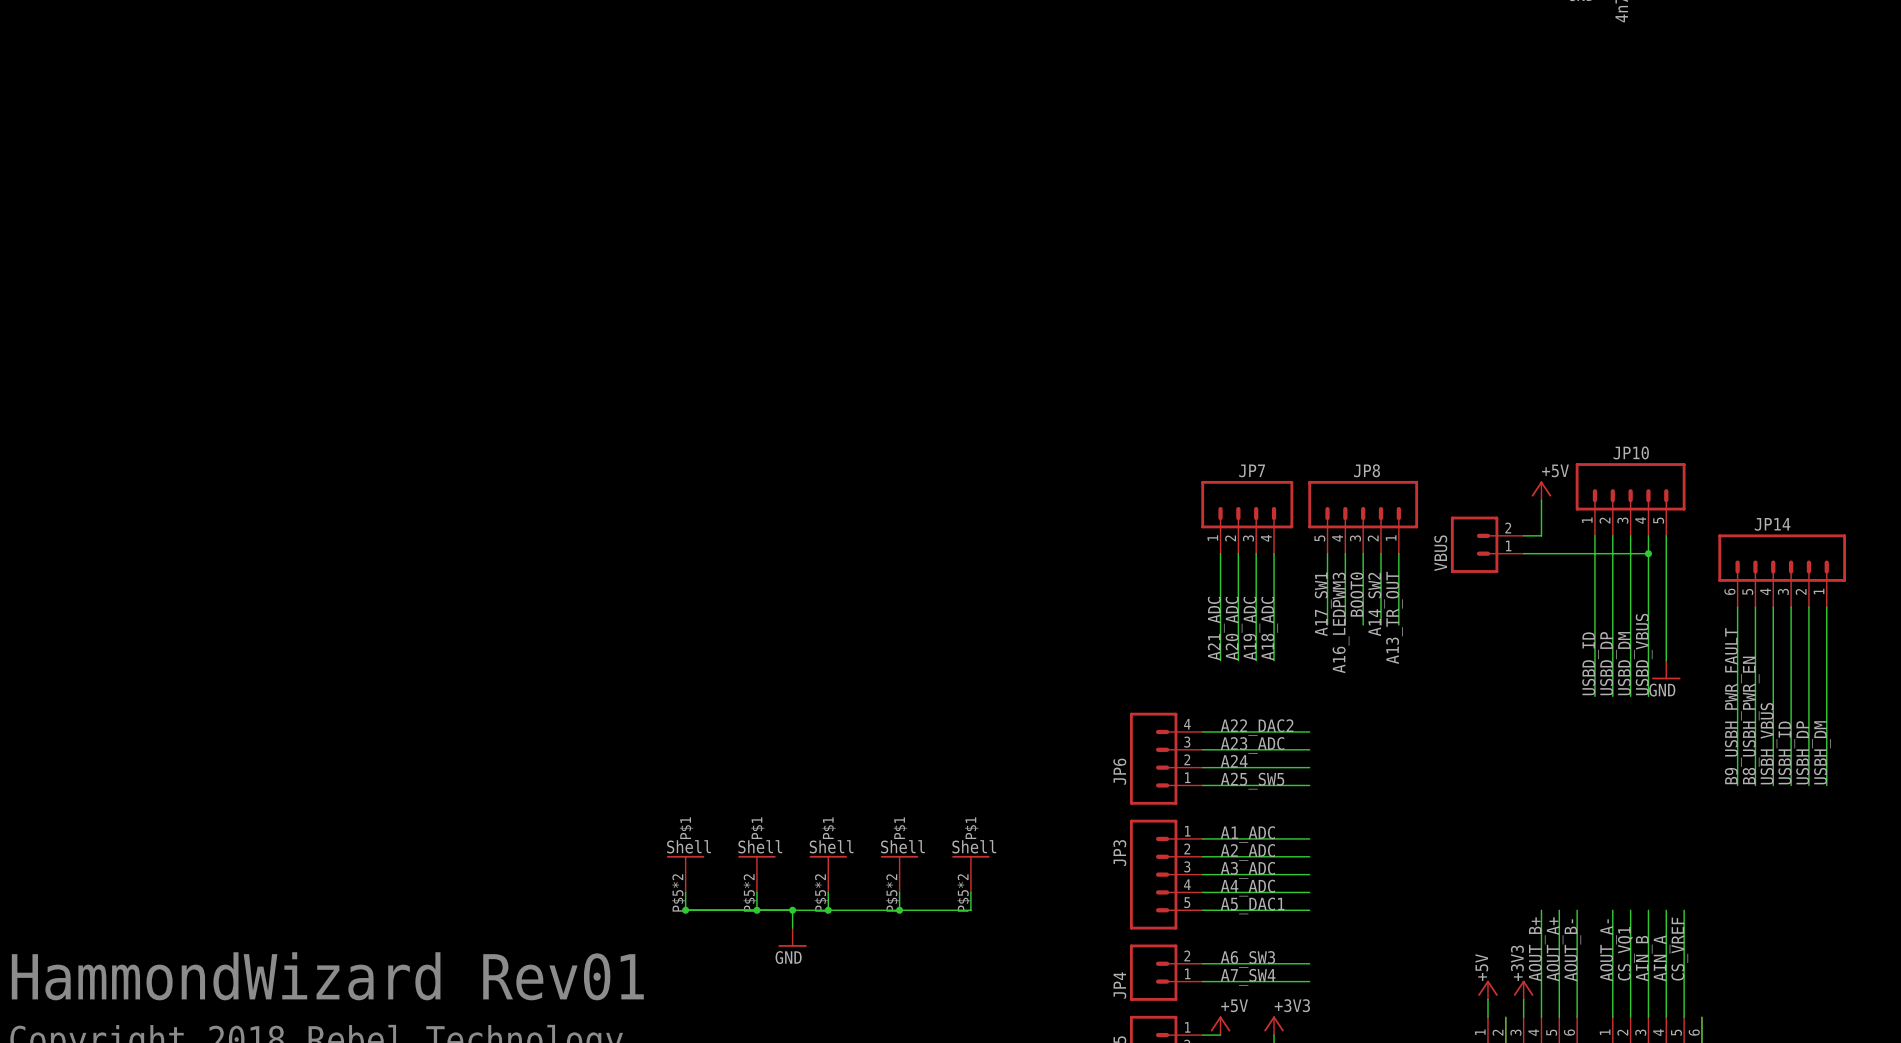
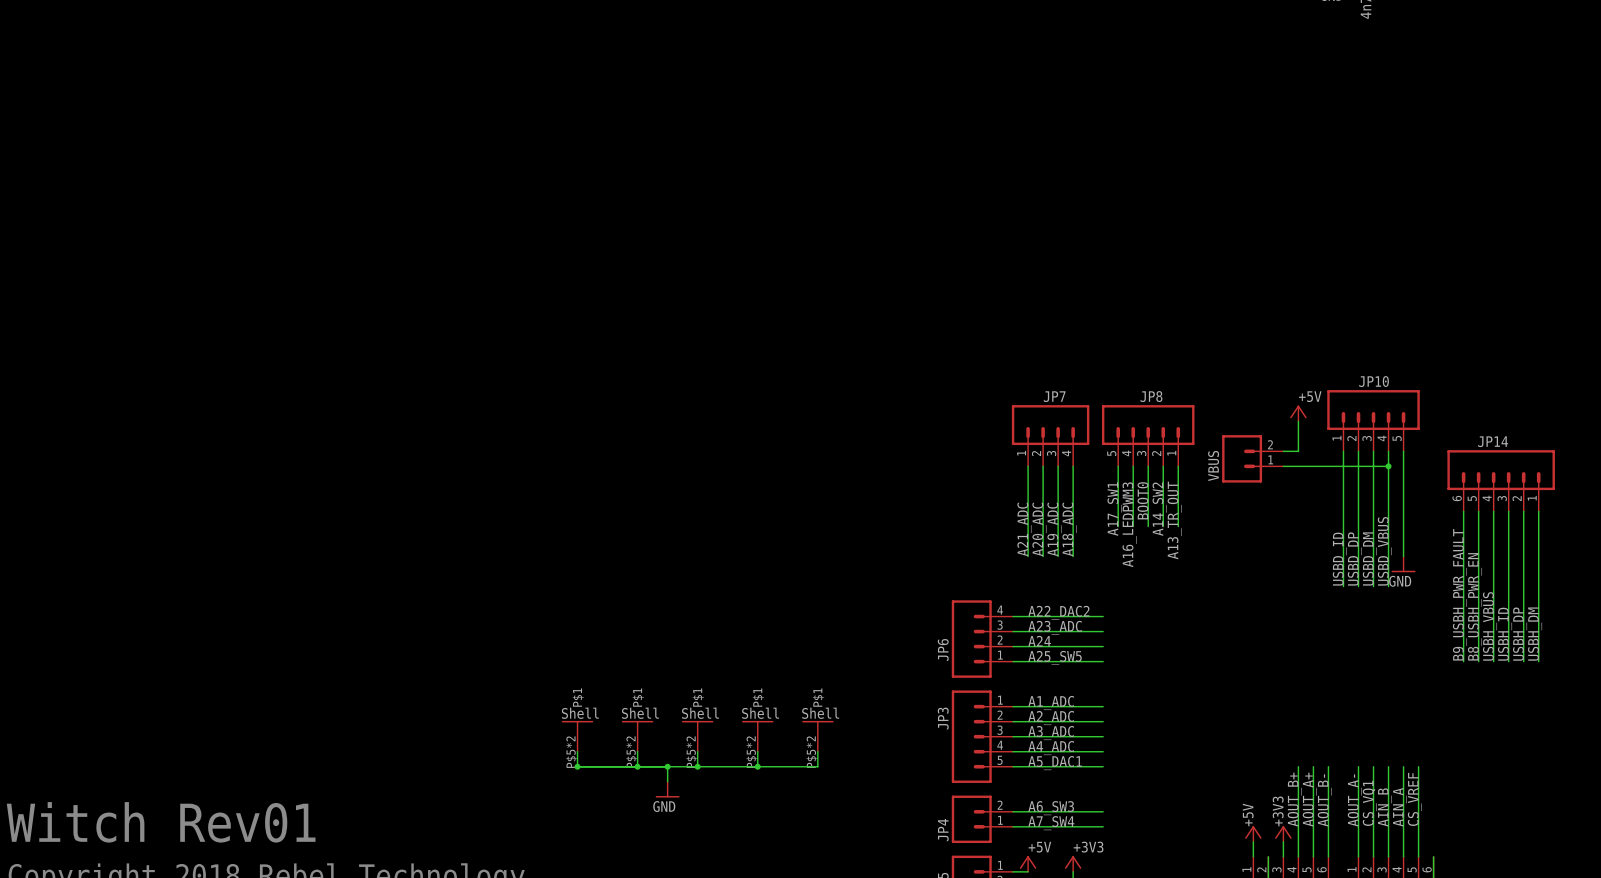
text: HammondWizard Rev01 (327, 976) -> Witch Rev01 (161, 822)

